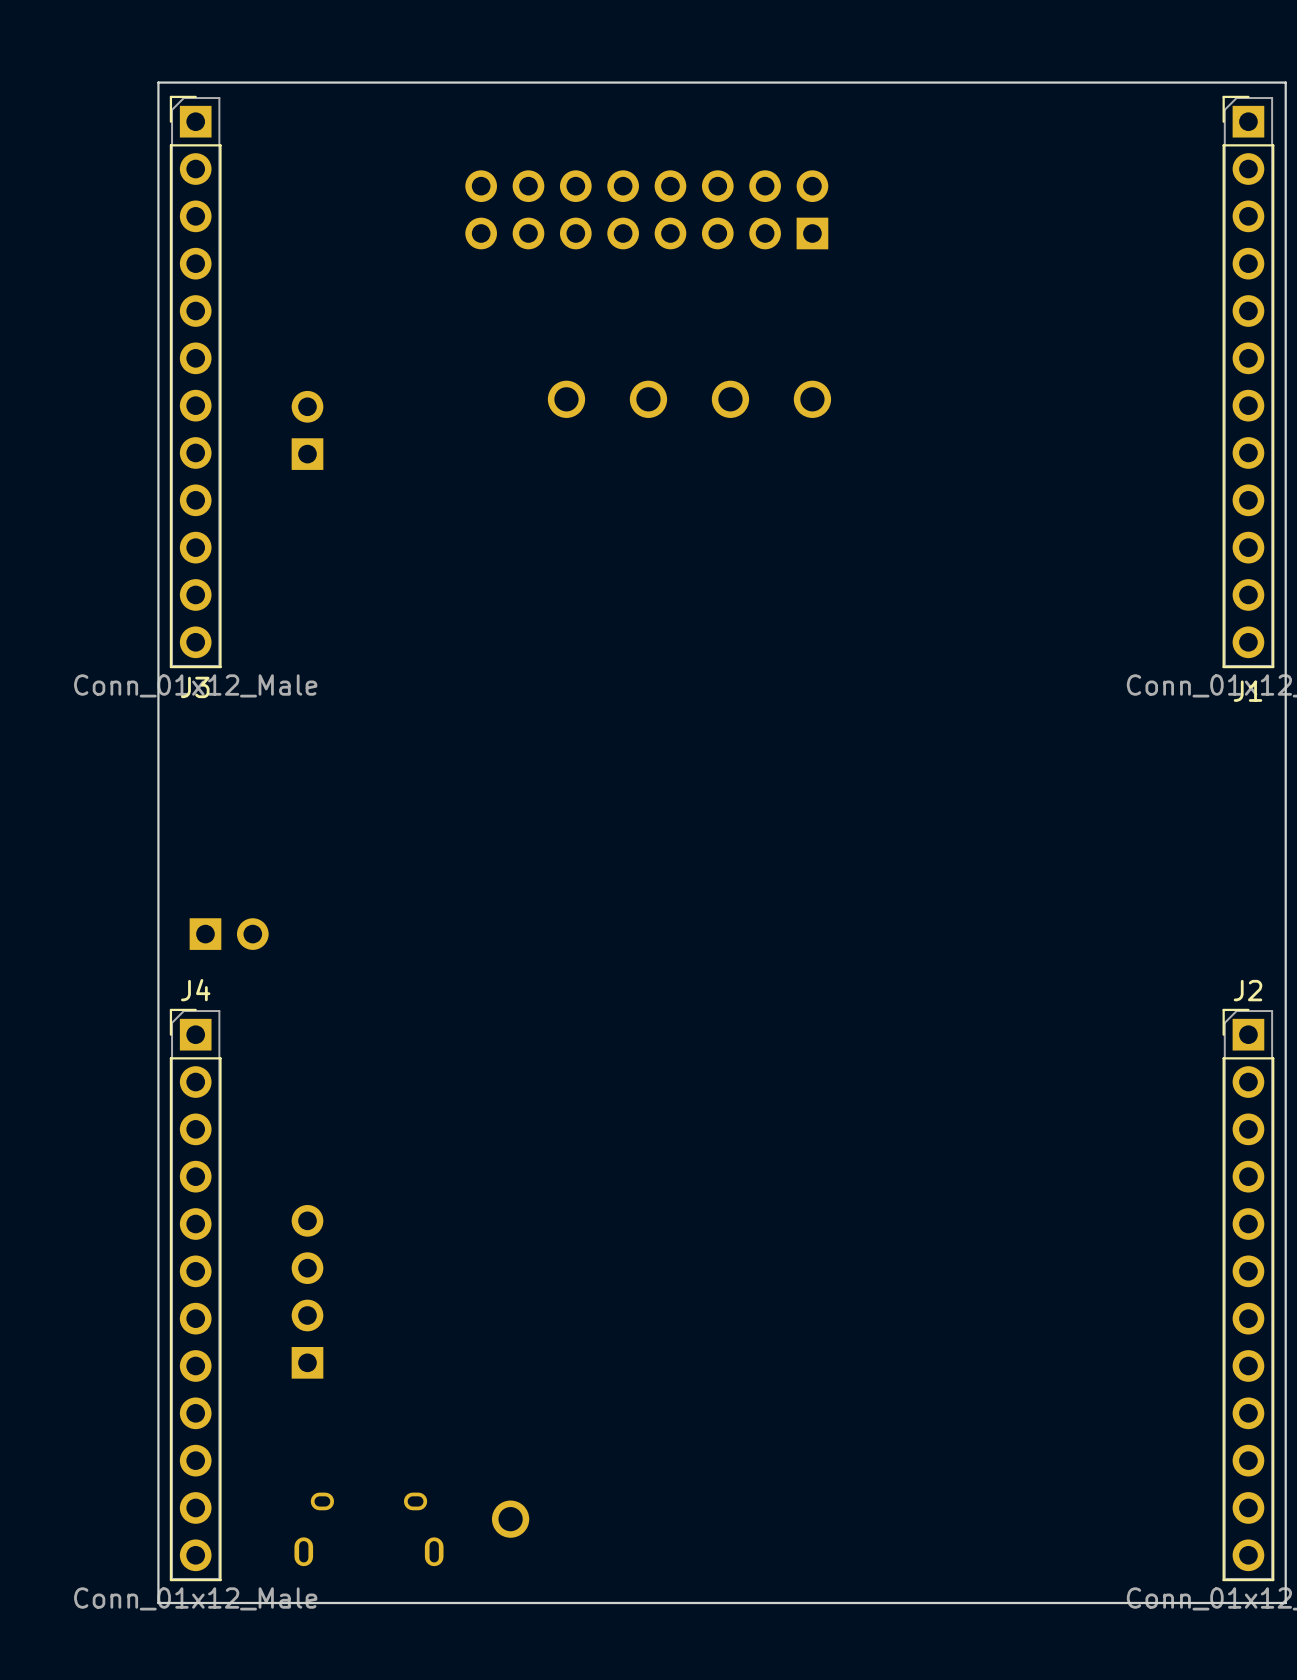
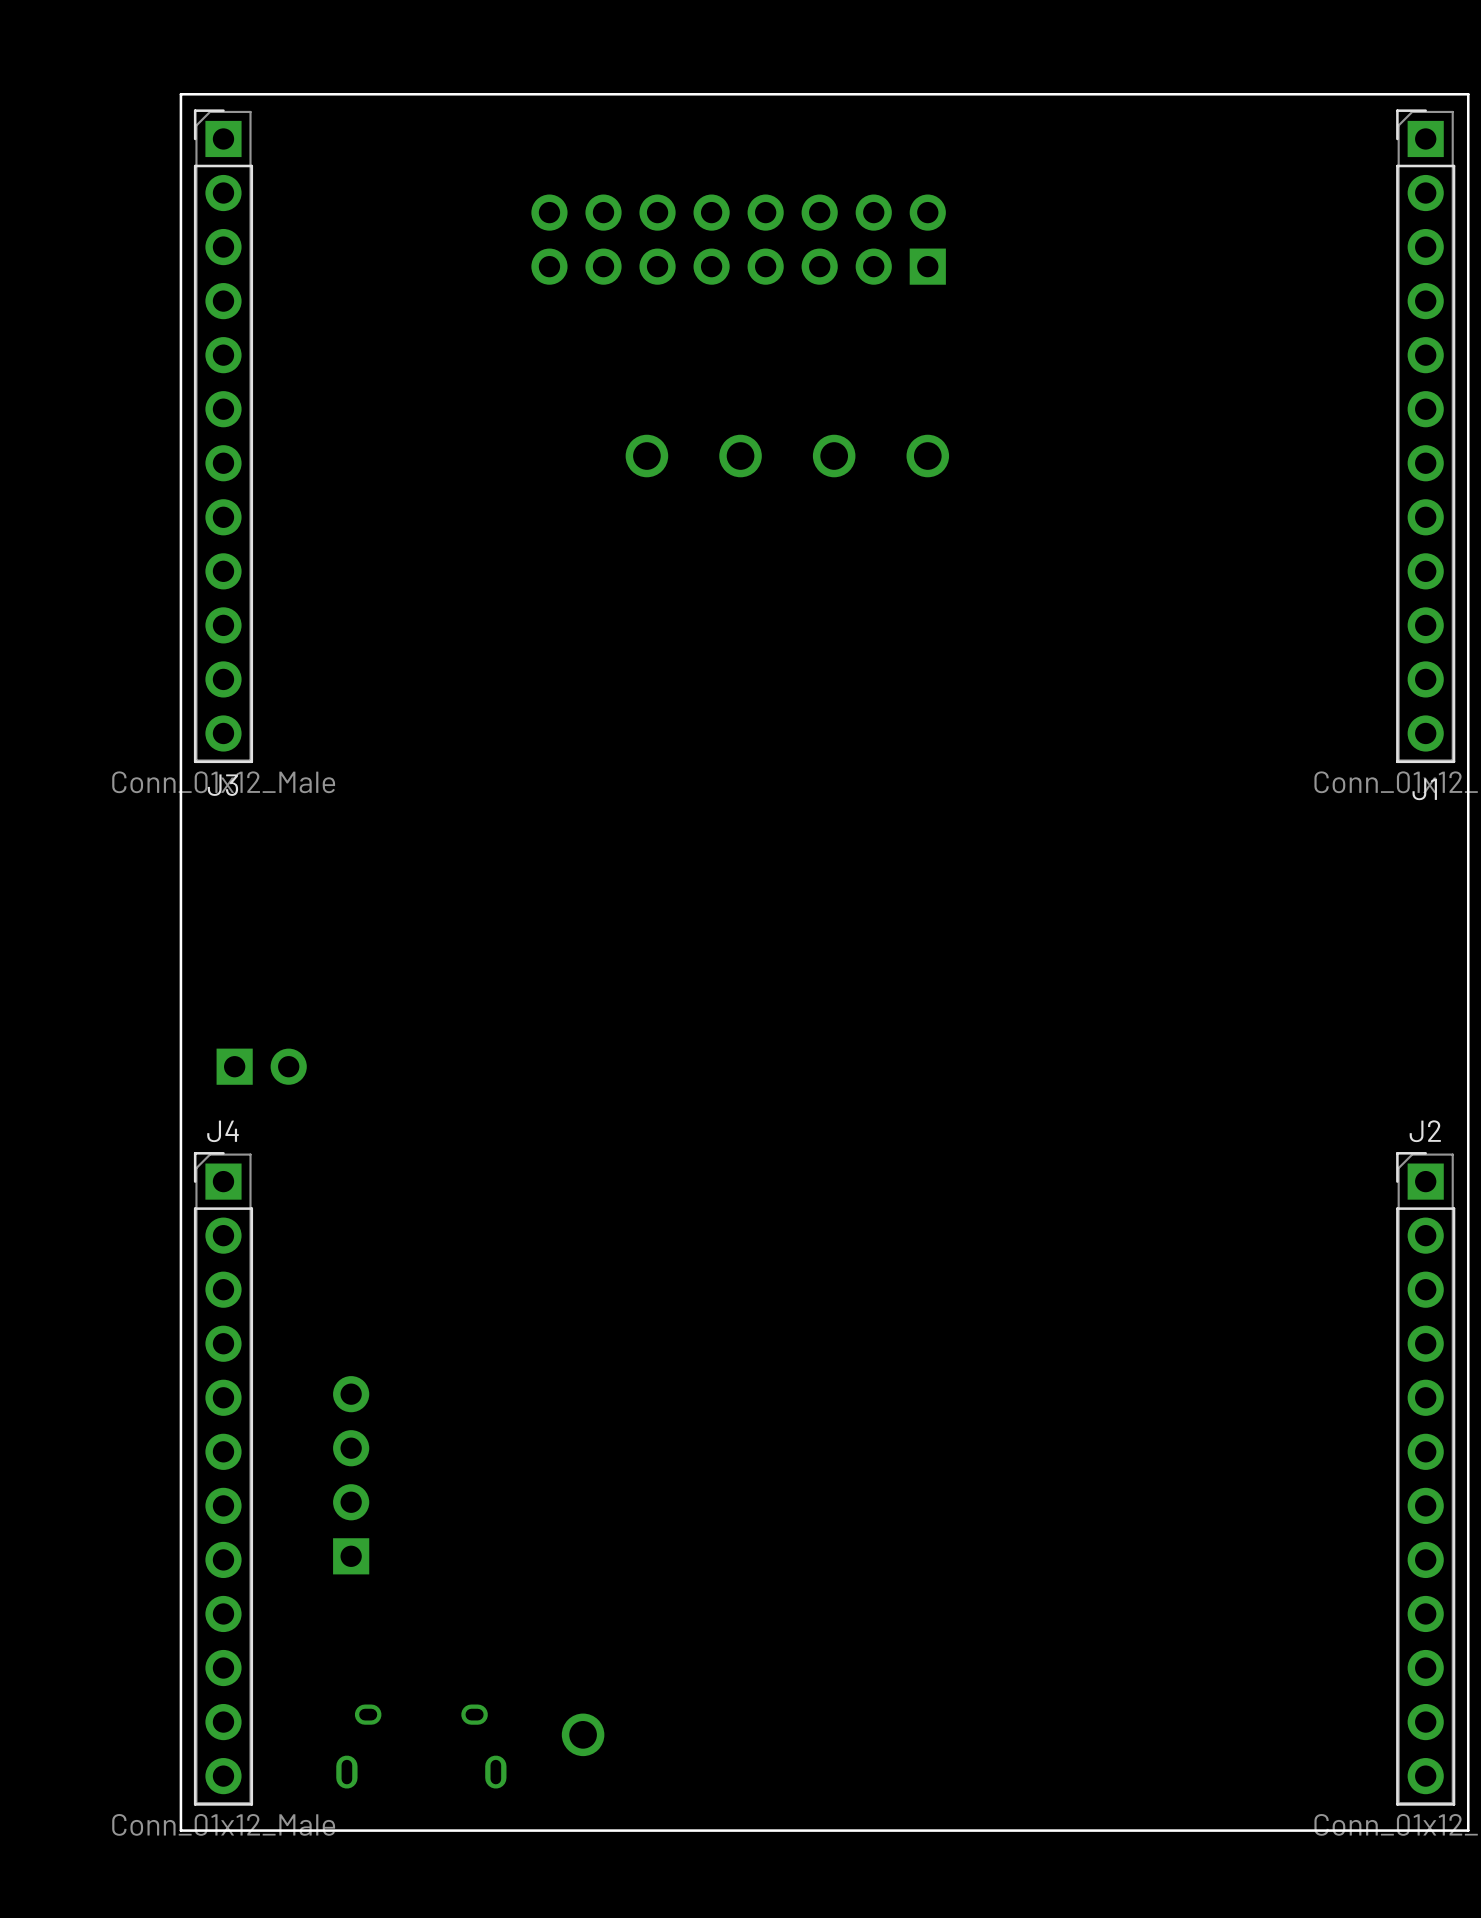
part: (307, 430) -> none

